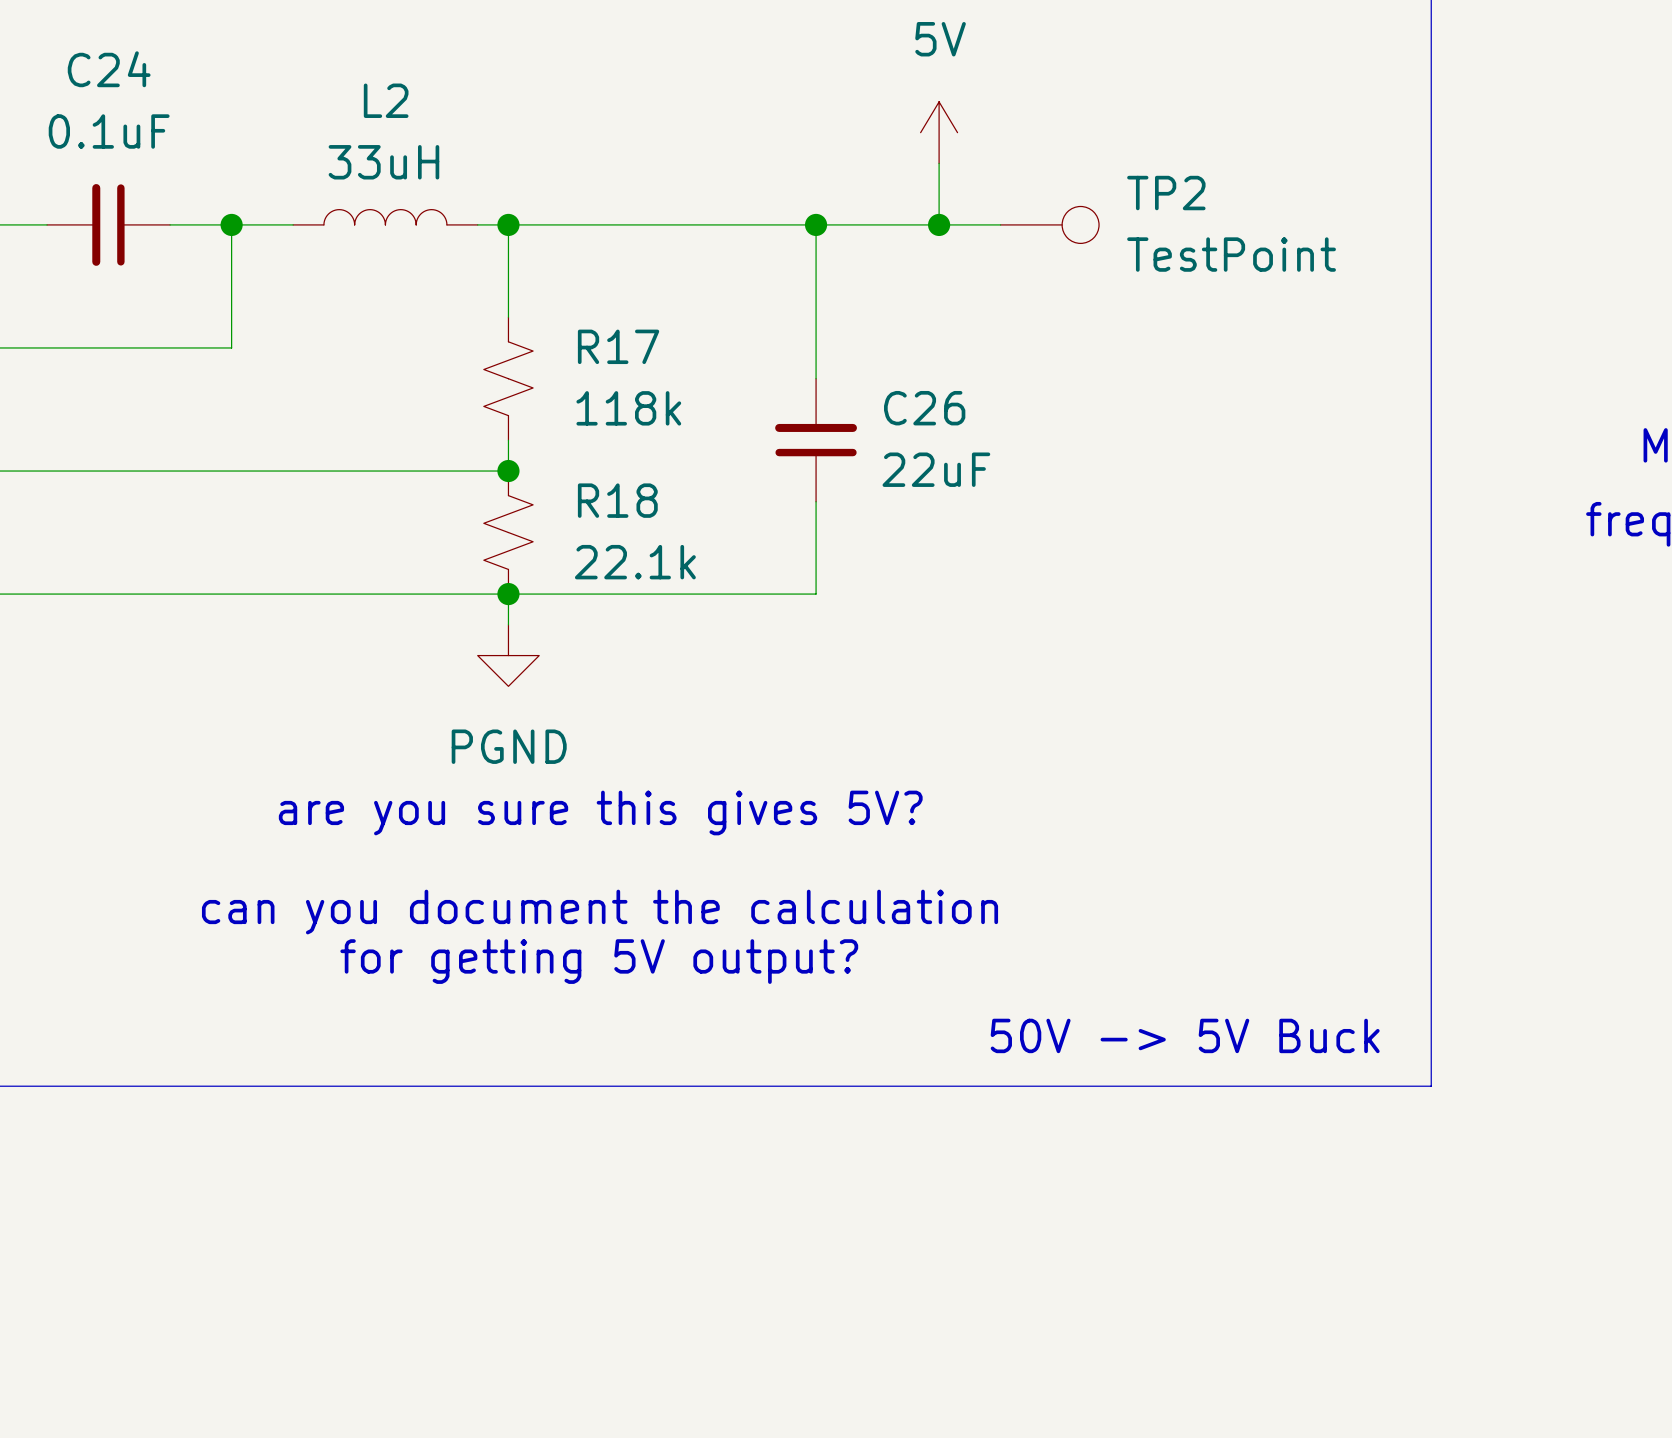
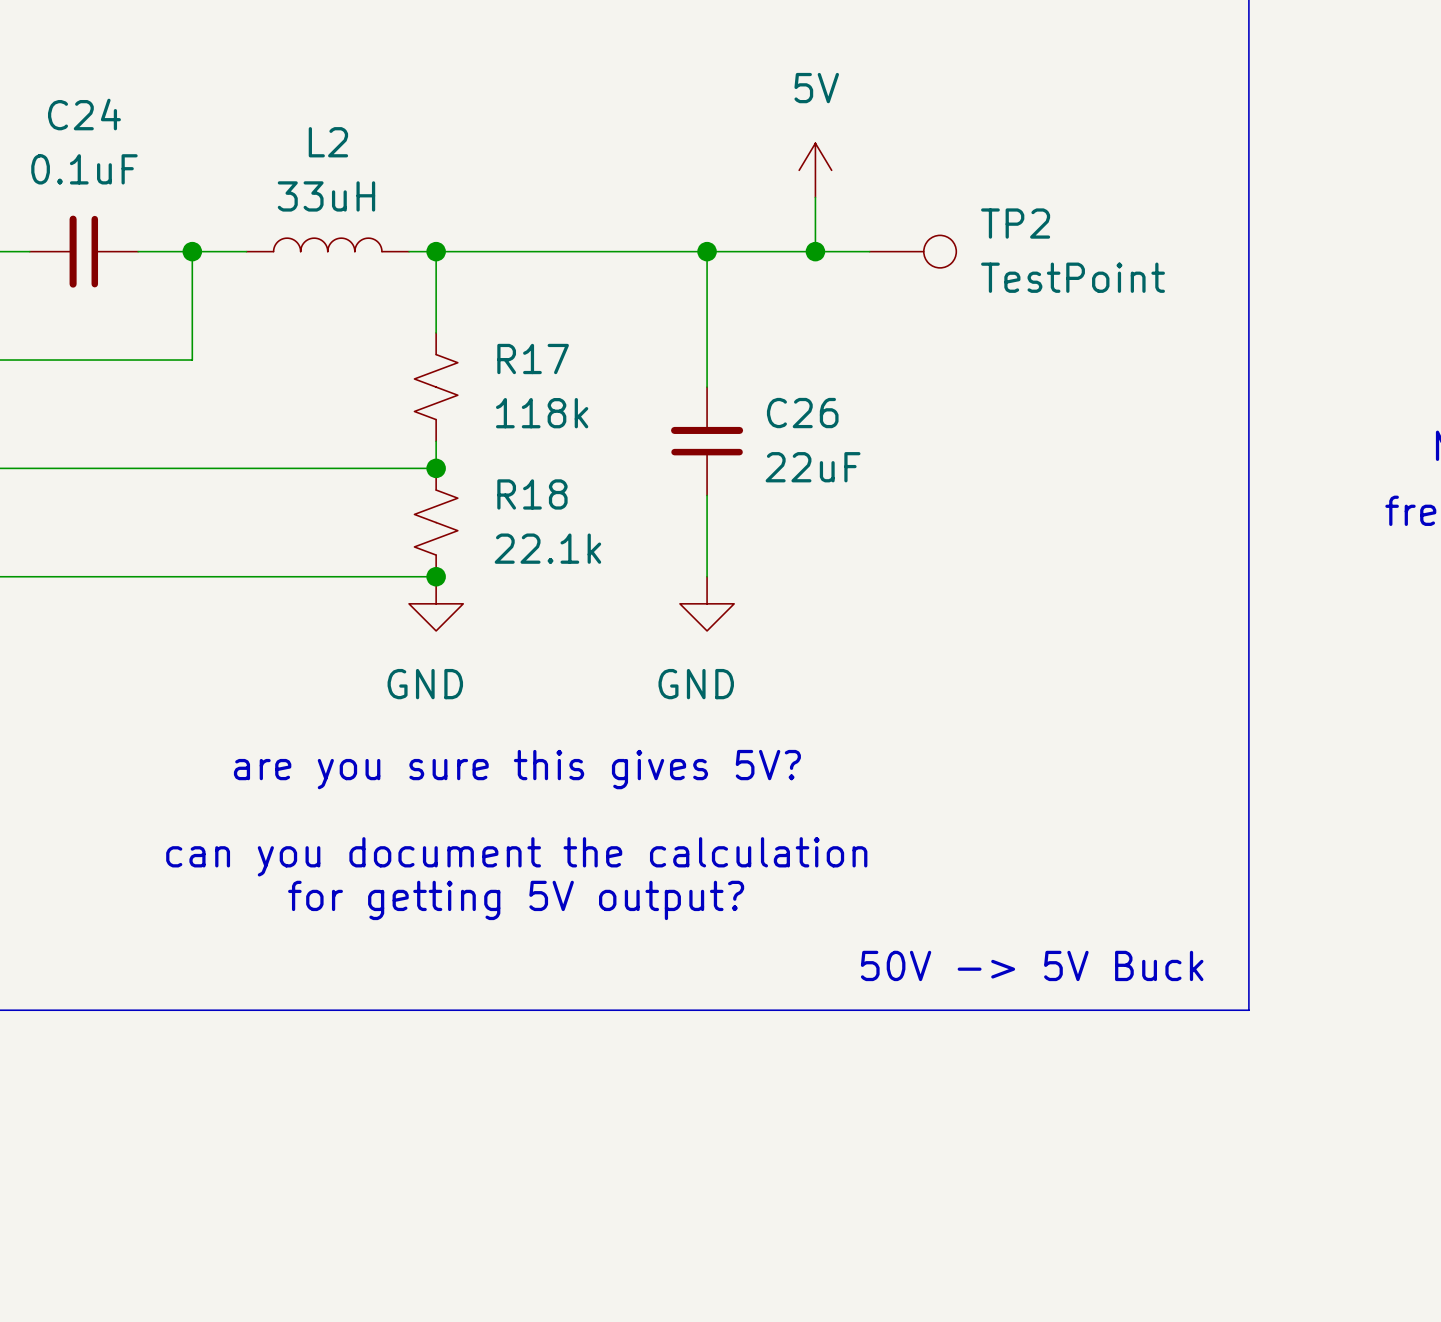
wire: (816, 594) (508, 594) (508, 624) -> none
power symbol: none -> GND (436, 603)
power symbol: none -> GND (707, 603)
power symbol: PGND (508, 655) -> none

